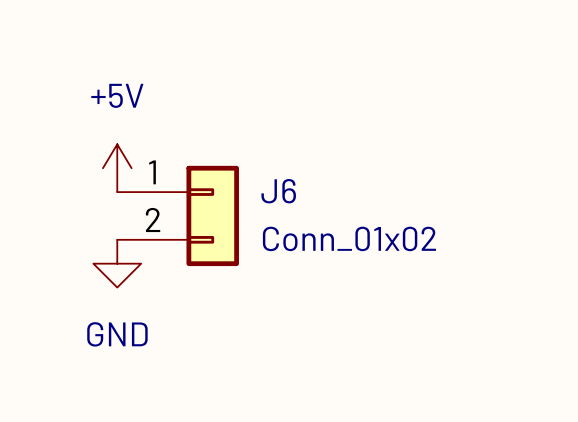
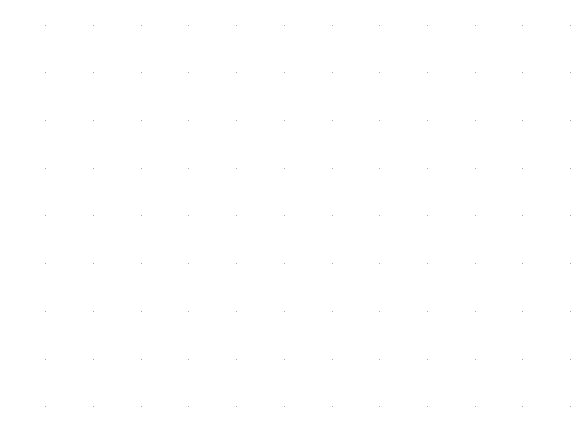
power symbol: +5V (117, 168) -> none
J6: Conn_01x02 (178, 215) -> none
power symbol: GND (117, 263) -> none

